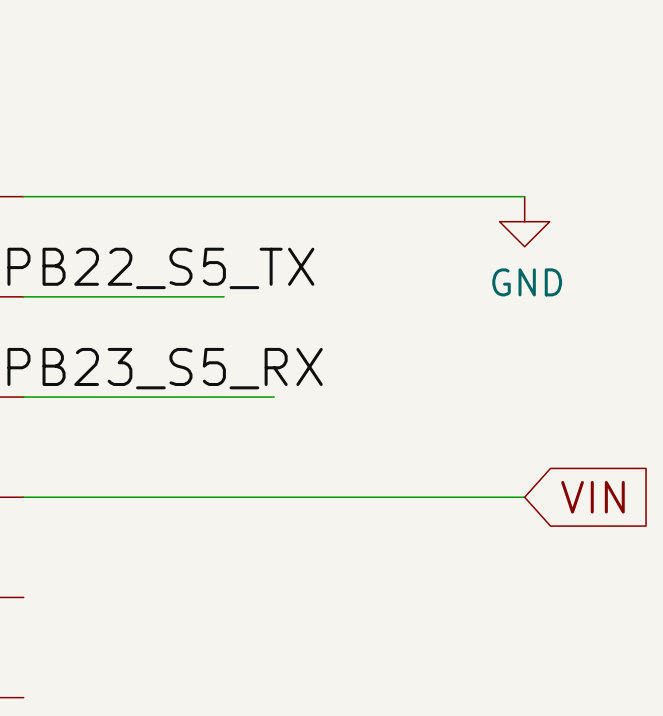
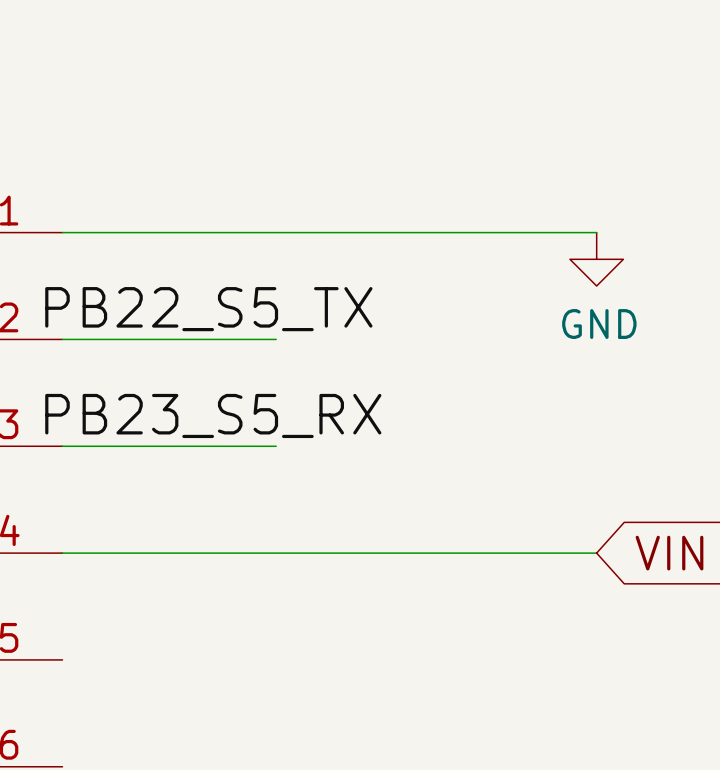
wire: (224, 397) (274, 397) -> none

